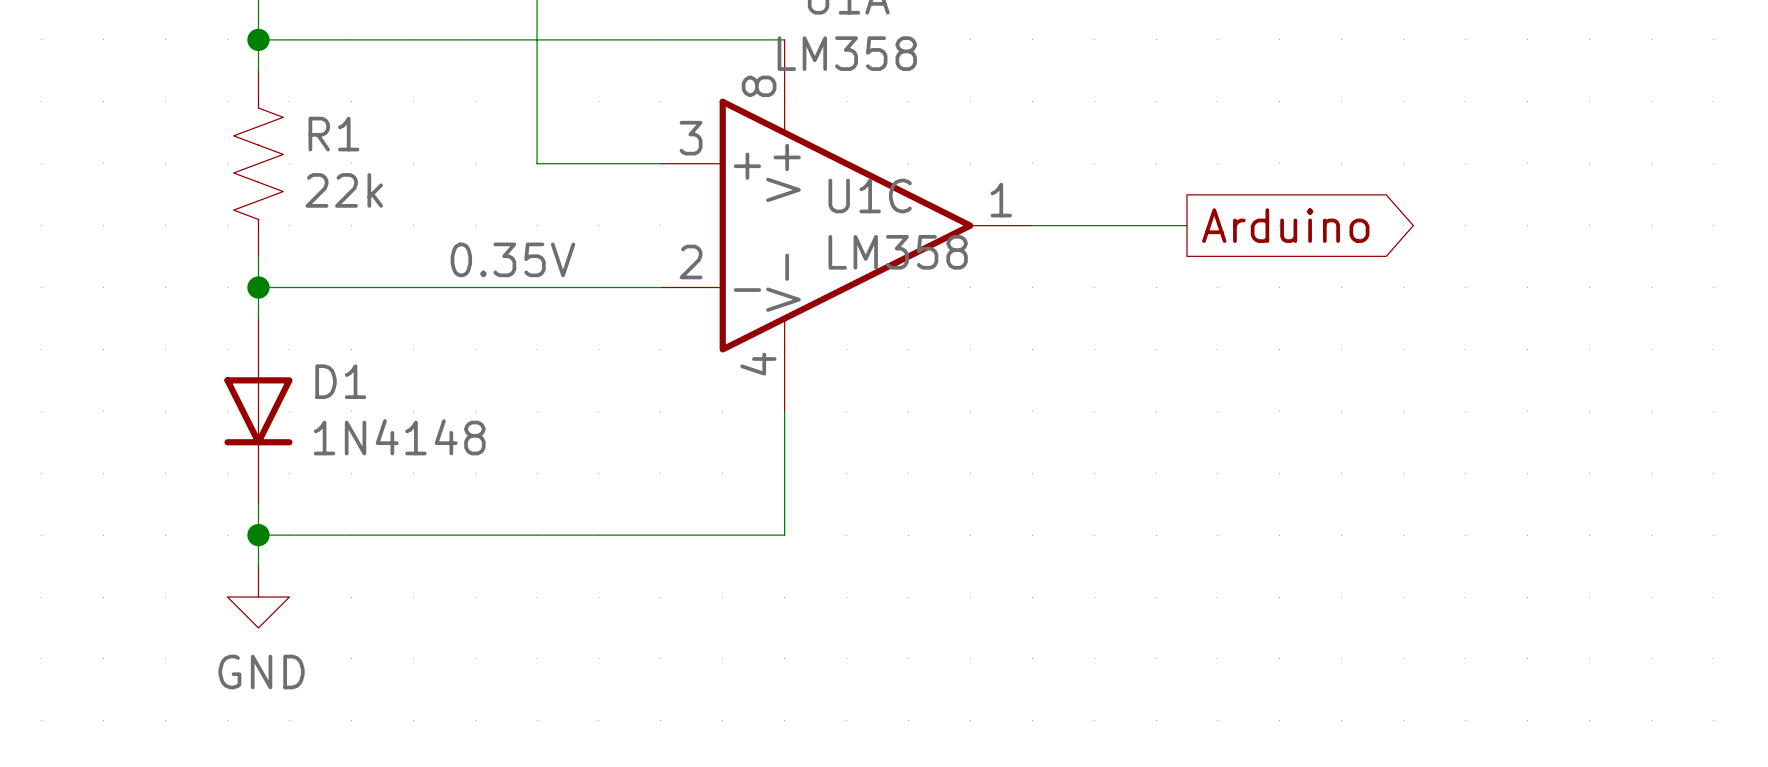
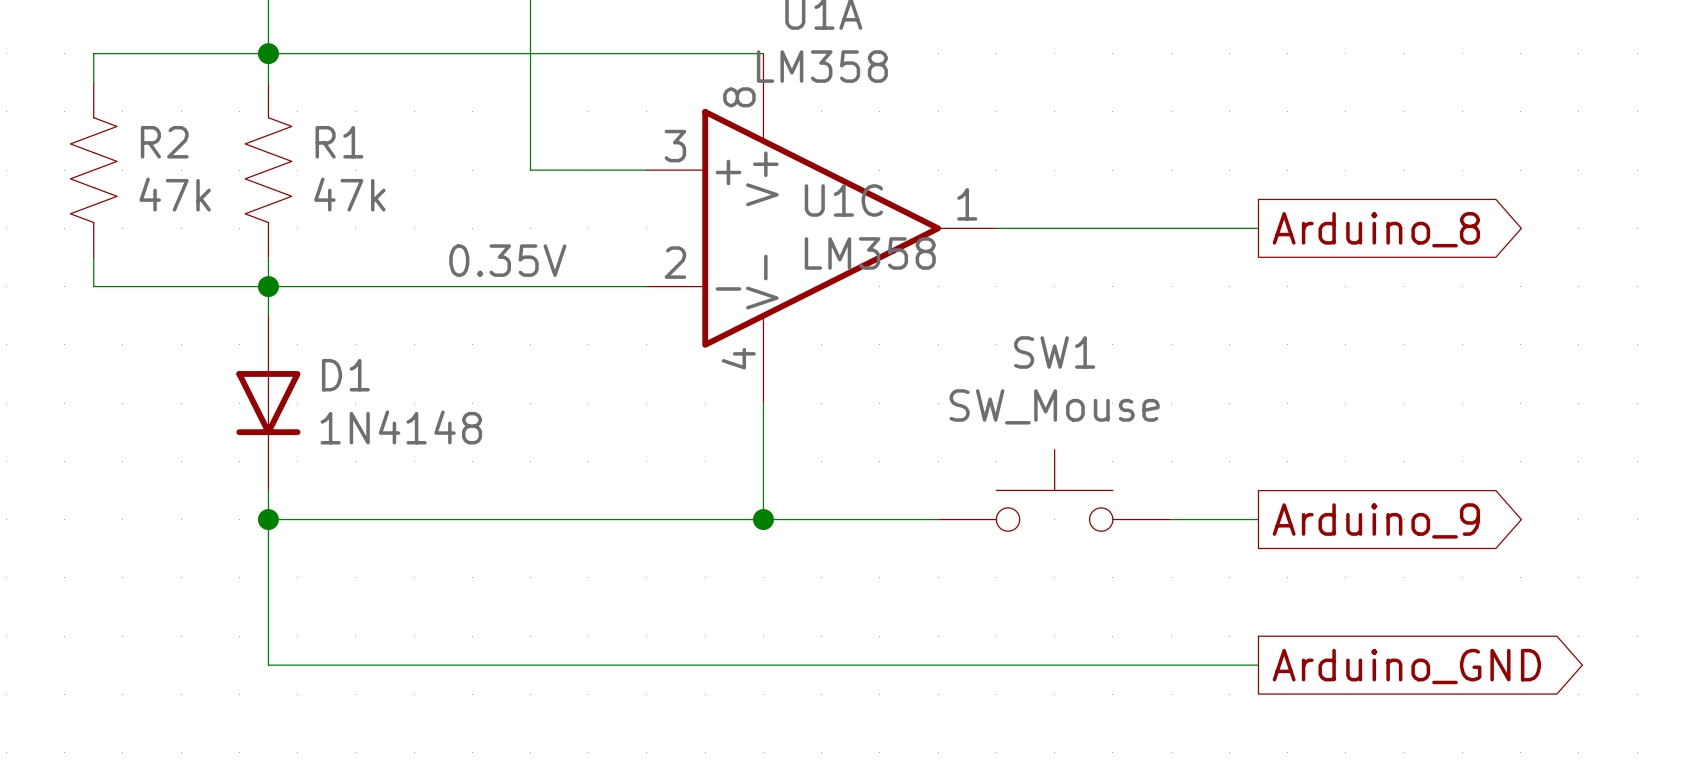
wire: none -> (268, 53) (93, 53) (93, 82)
R2: none -> 47k (93, 170)
R1 value: 22k (344, 190) -> 47k (349, 194)
wire: none -> (1141, 228) (1258, 228)
global label: Arduino (1285, 225) -> Arduino_8 (1376, 229)
wire: none -> (93, 257) (93, 286) (268, 286)
SW1: none -> SW_Mouse (1054, 490)
wire: none -> (763, 519) (938, 519)
junction: none -> (763, 519)
wire: none -> (1171, 519) (1258, 519)
global label: none -> Arduino_9 (1376, 520)
wire: none -> (268, 548) (268, 665) (1258, 665)
power symbol: GND (258, 597) -> none
global label: none -> Arduino_GND (1406, 666)

